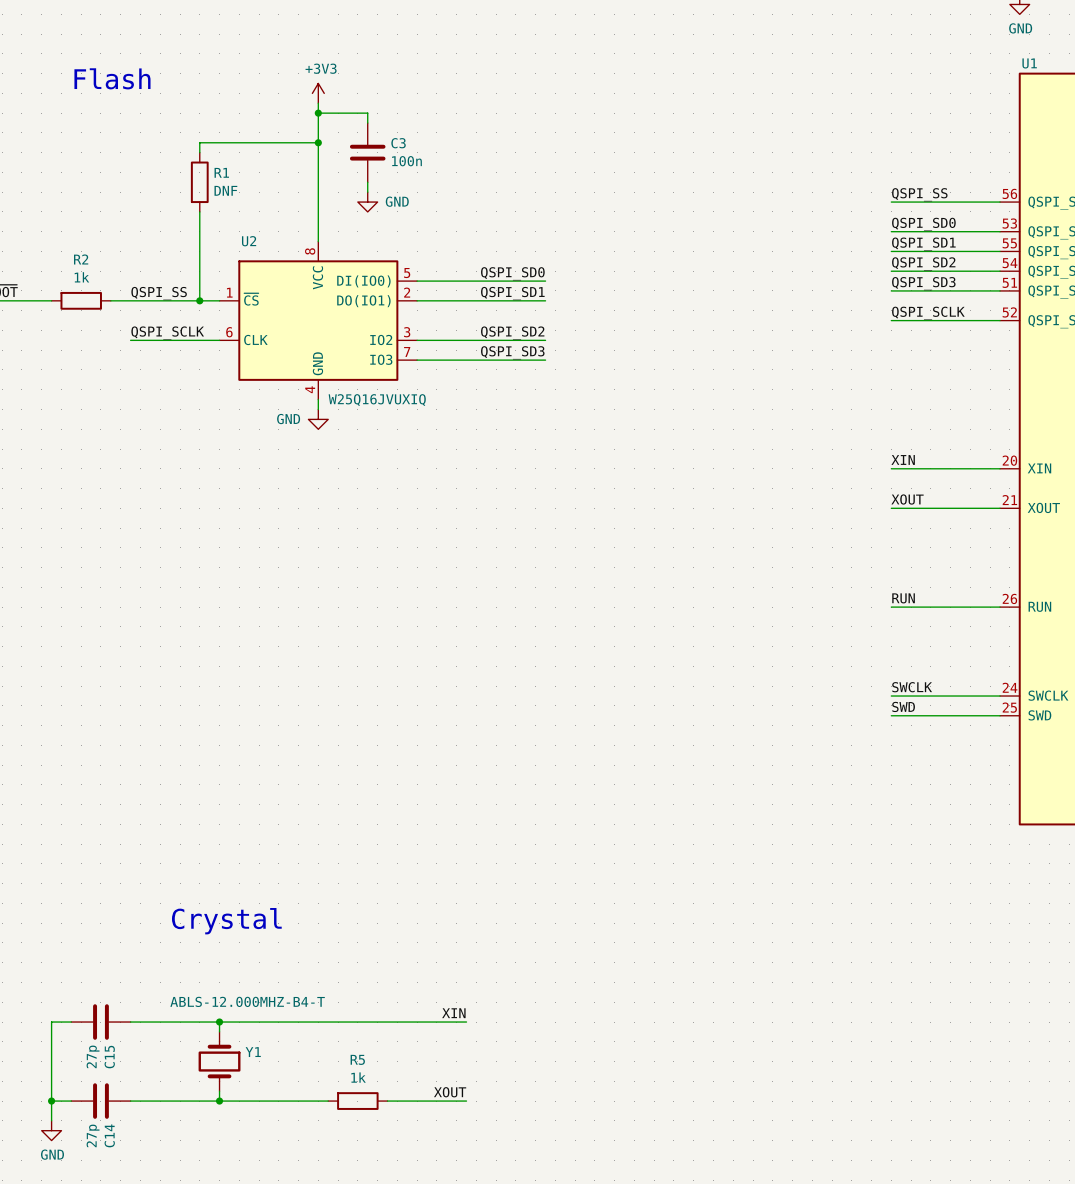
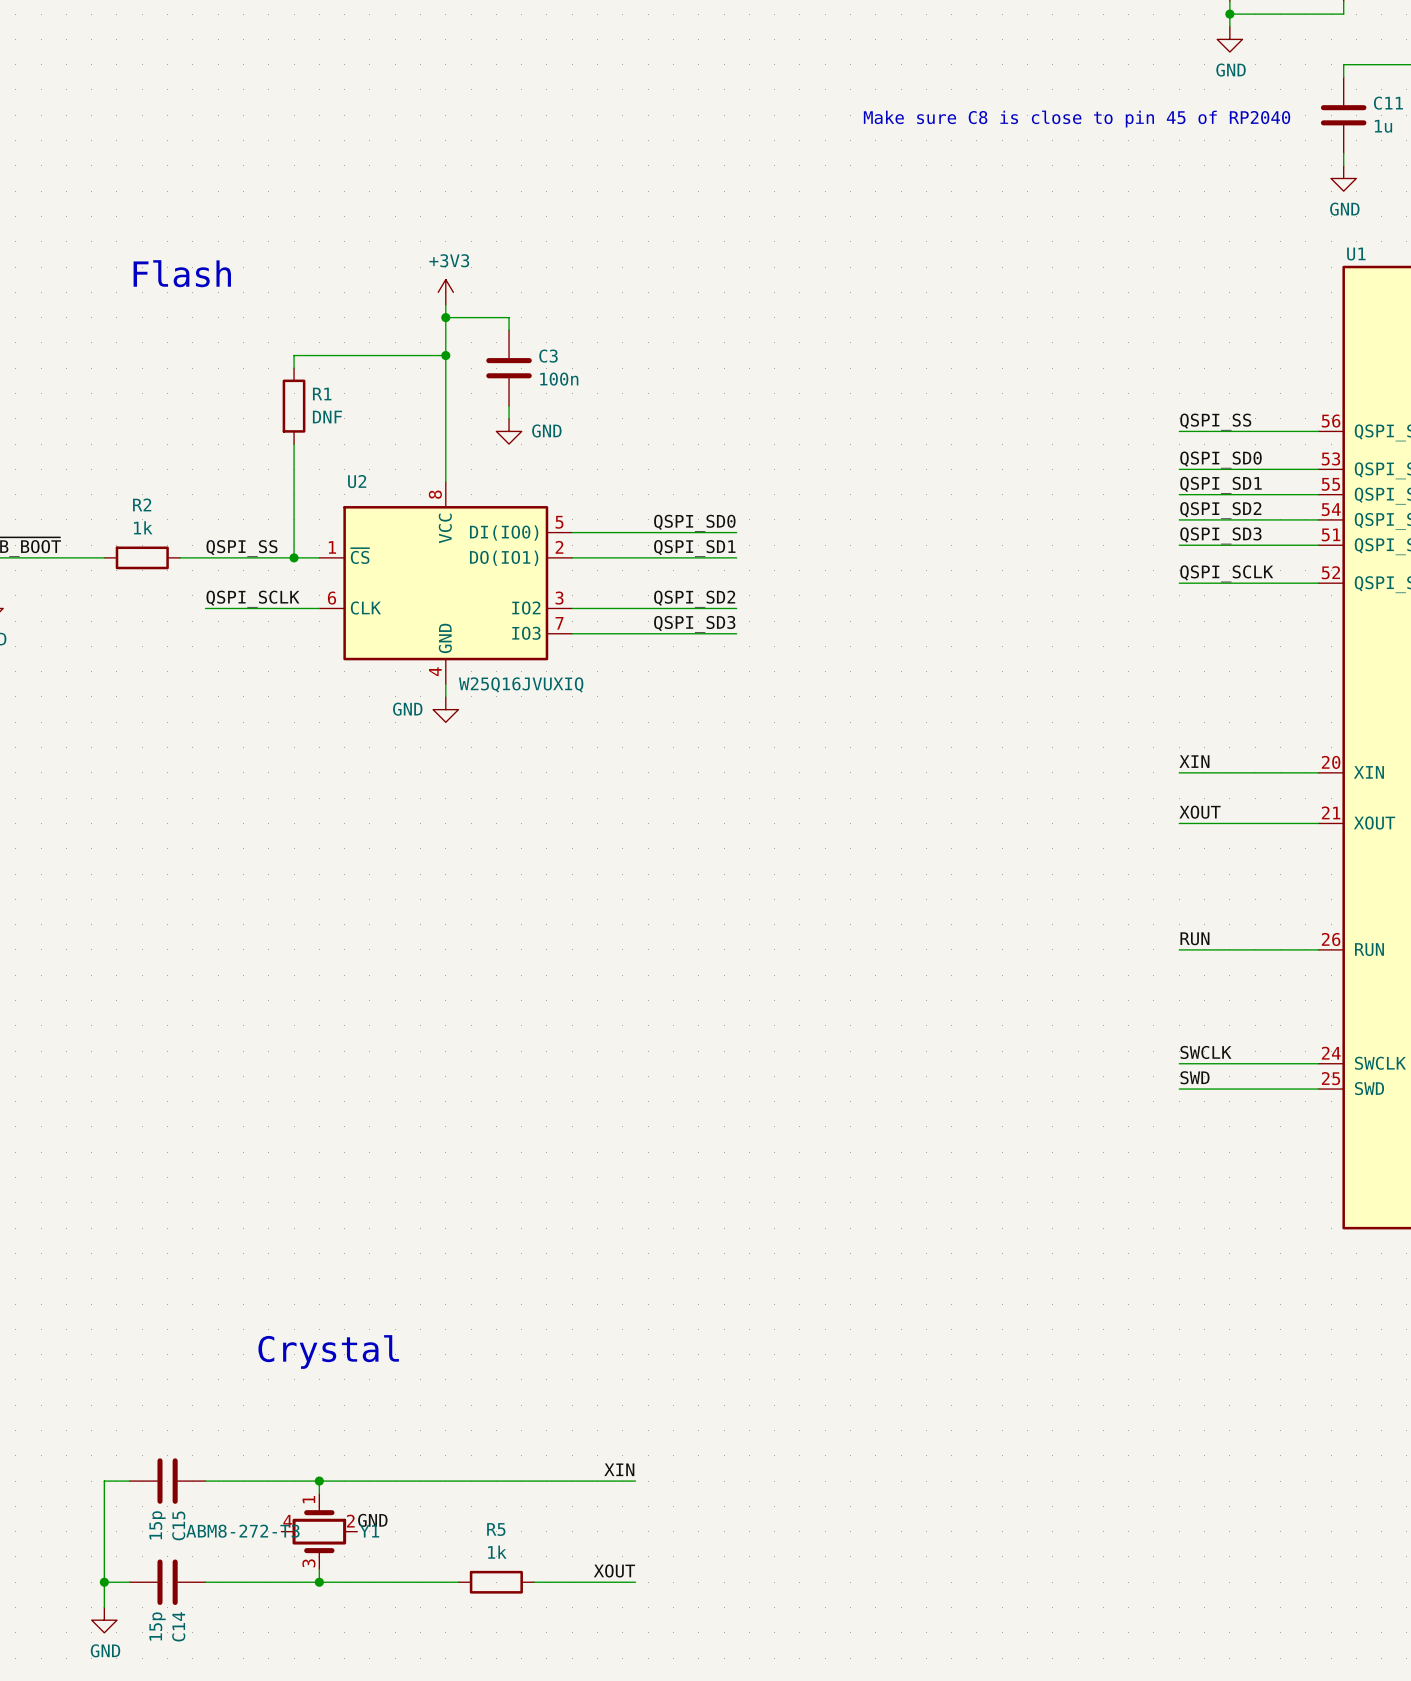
Y1 value: ABLS-12.000MHZ-B4-T (247, 1001) -> ABM8-272-T3 (242, 1531)
Y1 symbol: [198, 1031, 241, 1092] -> [281, 1493, 358, 1570]
label: none -> GND (372, 1520)
C15 value: 27p (93, 1056) -> 15p (157, 1525)
C14 value: 27p (93, 1135) -> 15p (157, 1626)

